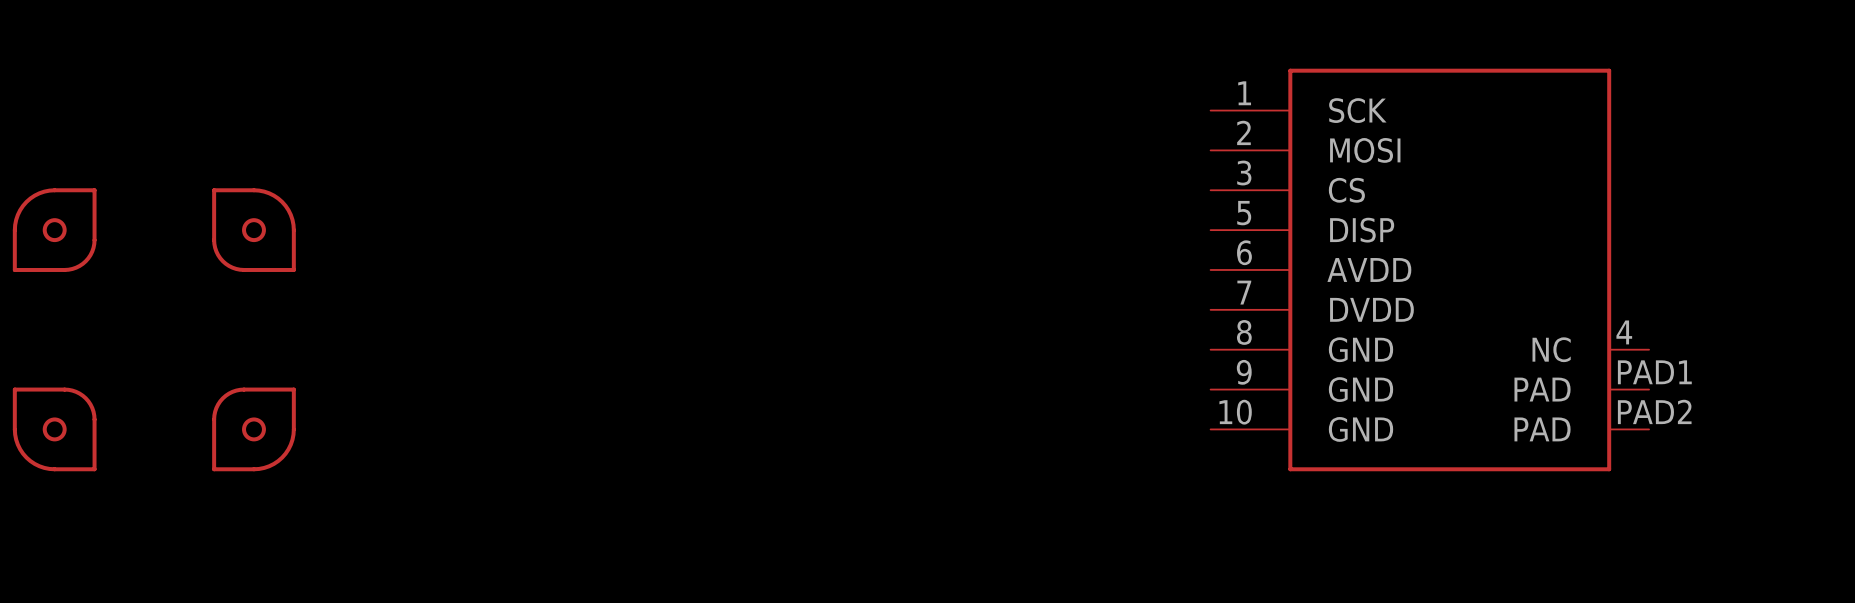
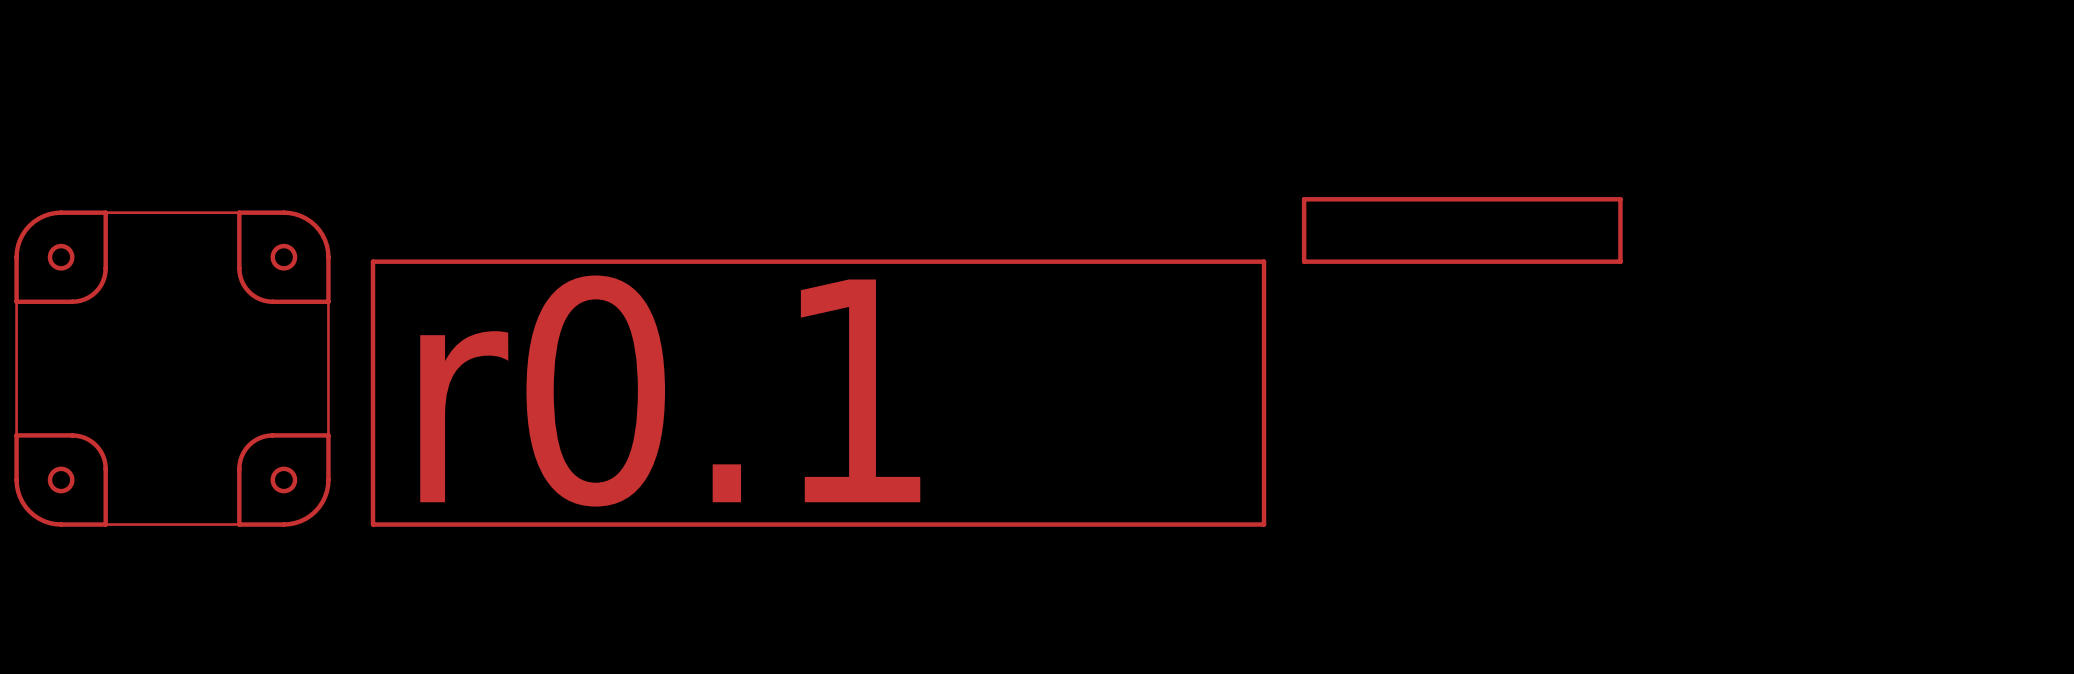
line: none -> (105, 212) (239, 212)
part: none -> (1462, 230)
line: none -> (16, 301) (16, 435)
line: none -> (328, 301) (328, 435)
part: (1429, 269) -> none
part: none -> r0.1 (818, 393)
line: none -> (105, 524) (239, 524)

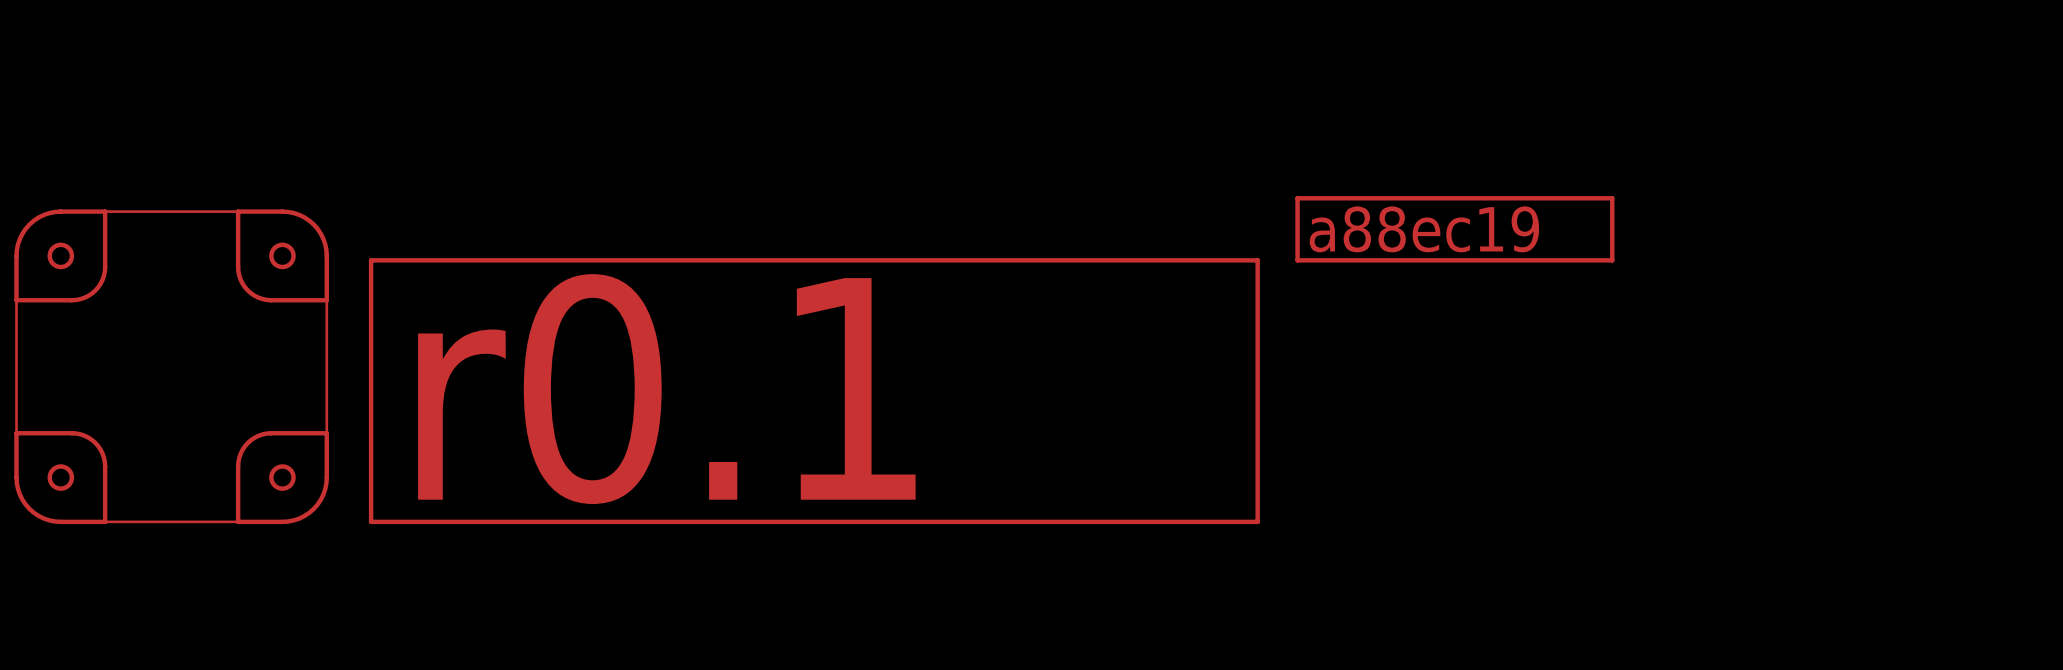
part value: none -> a88ec19 (1424, 229)

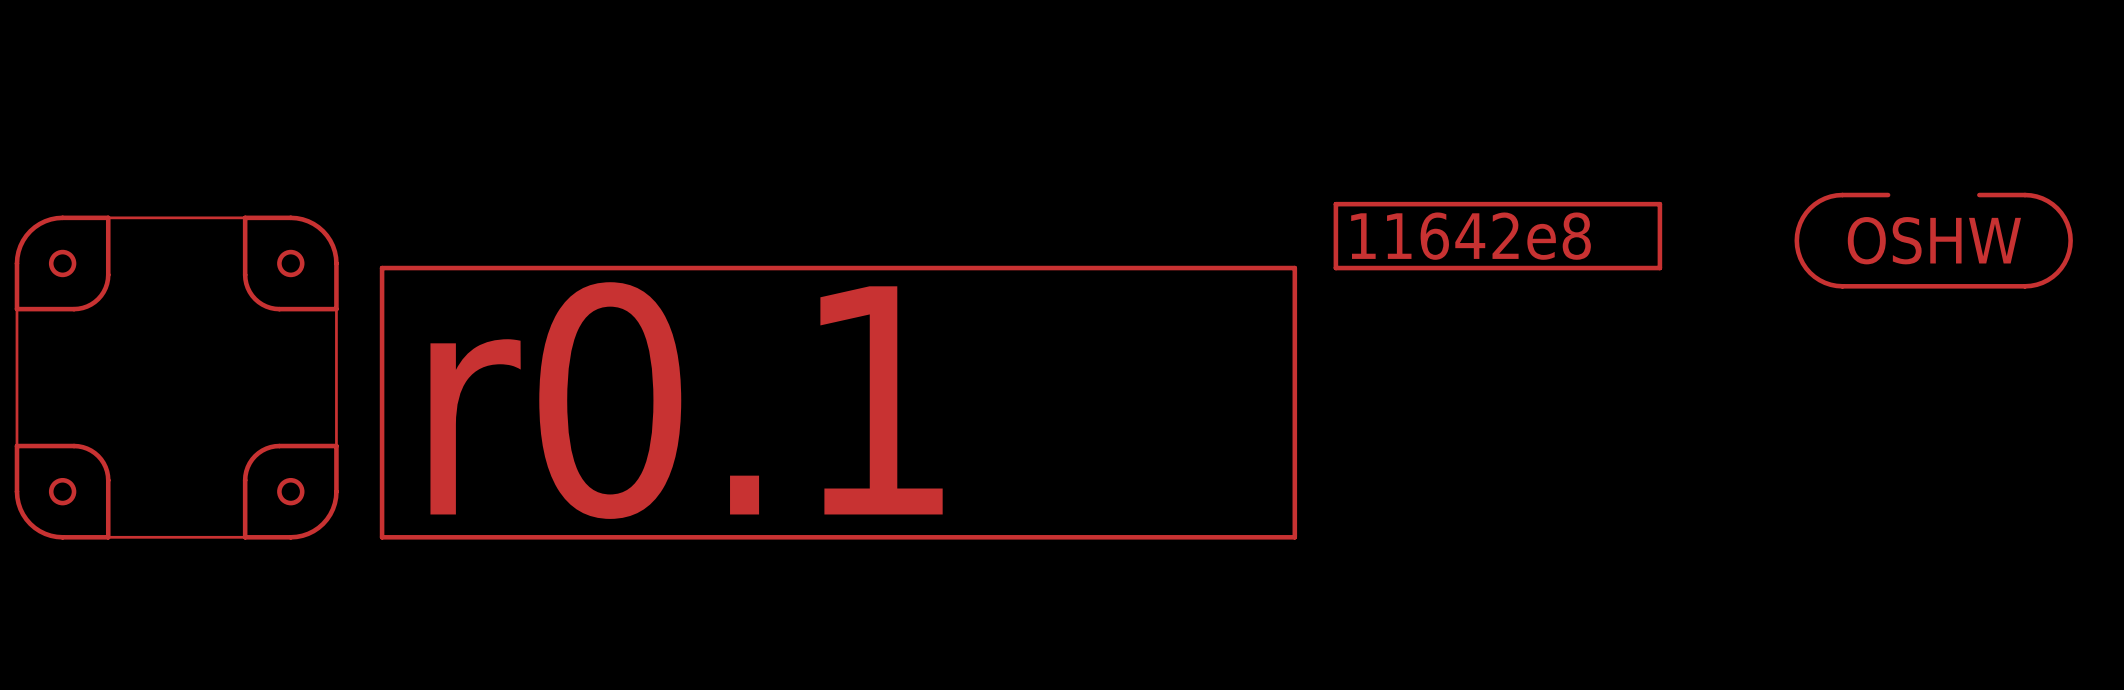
part value: a88ec19 (1424, 229) -> 11642e8 (1471, 236)
part: none -> (1933, 240)

